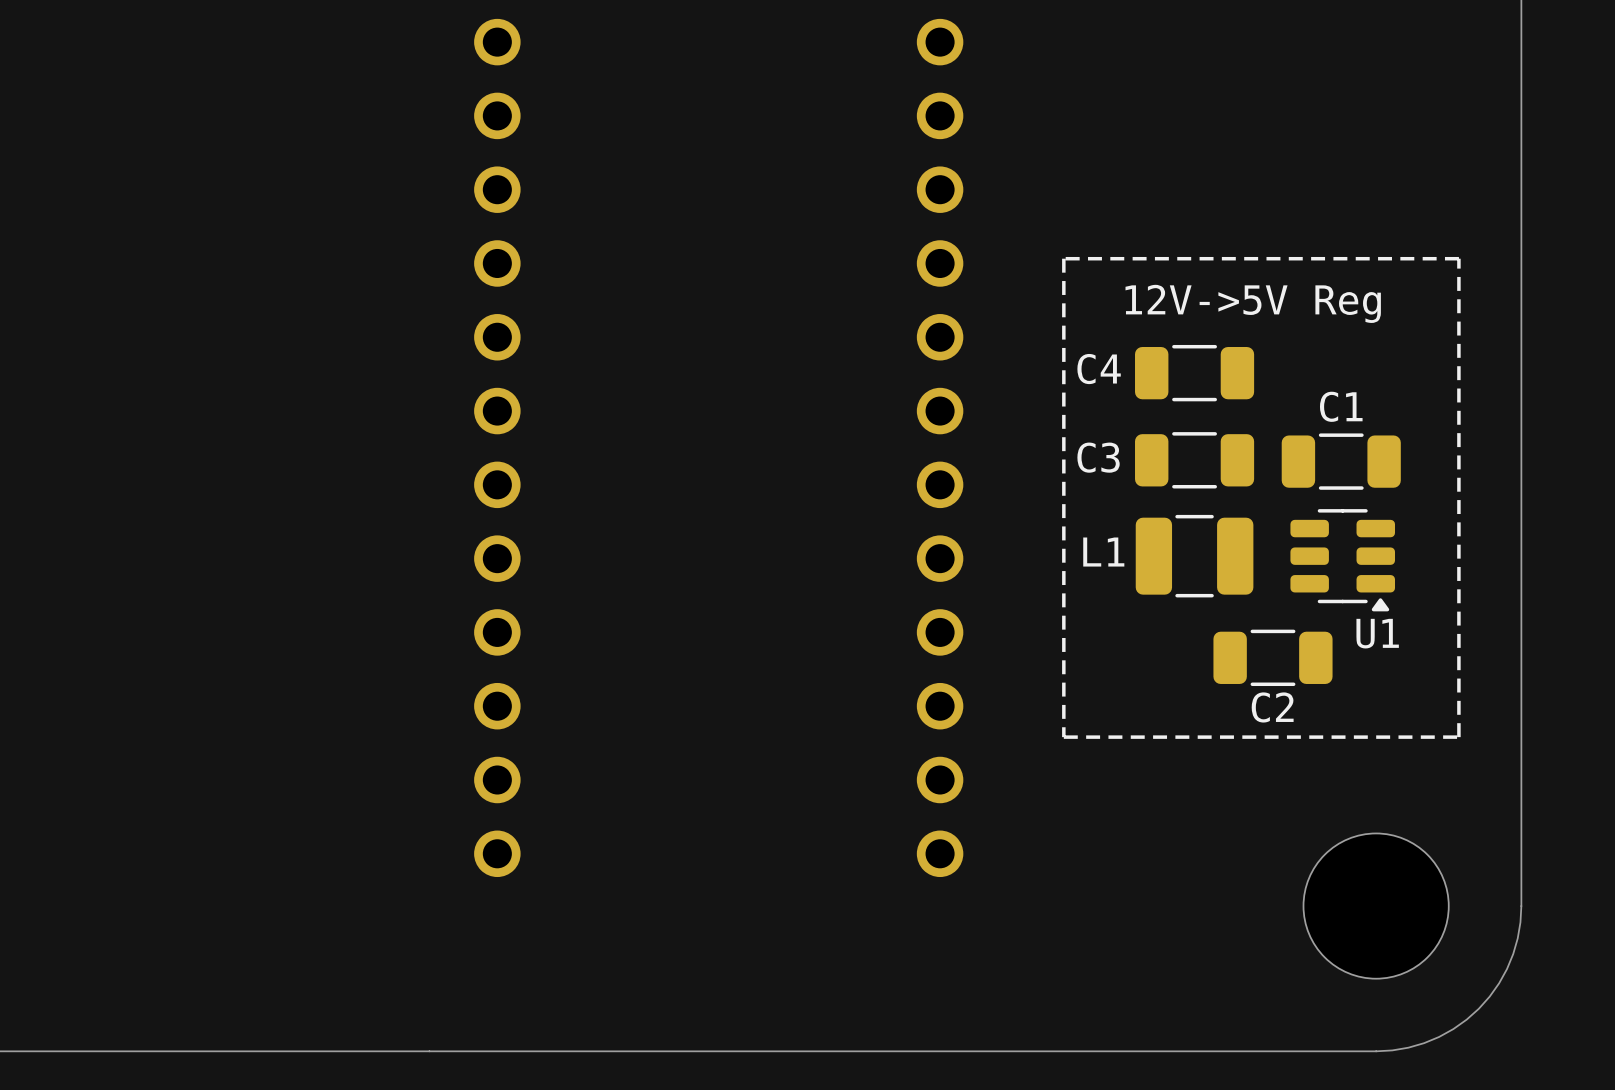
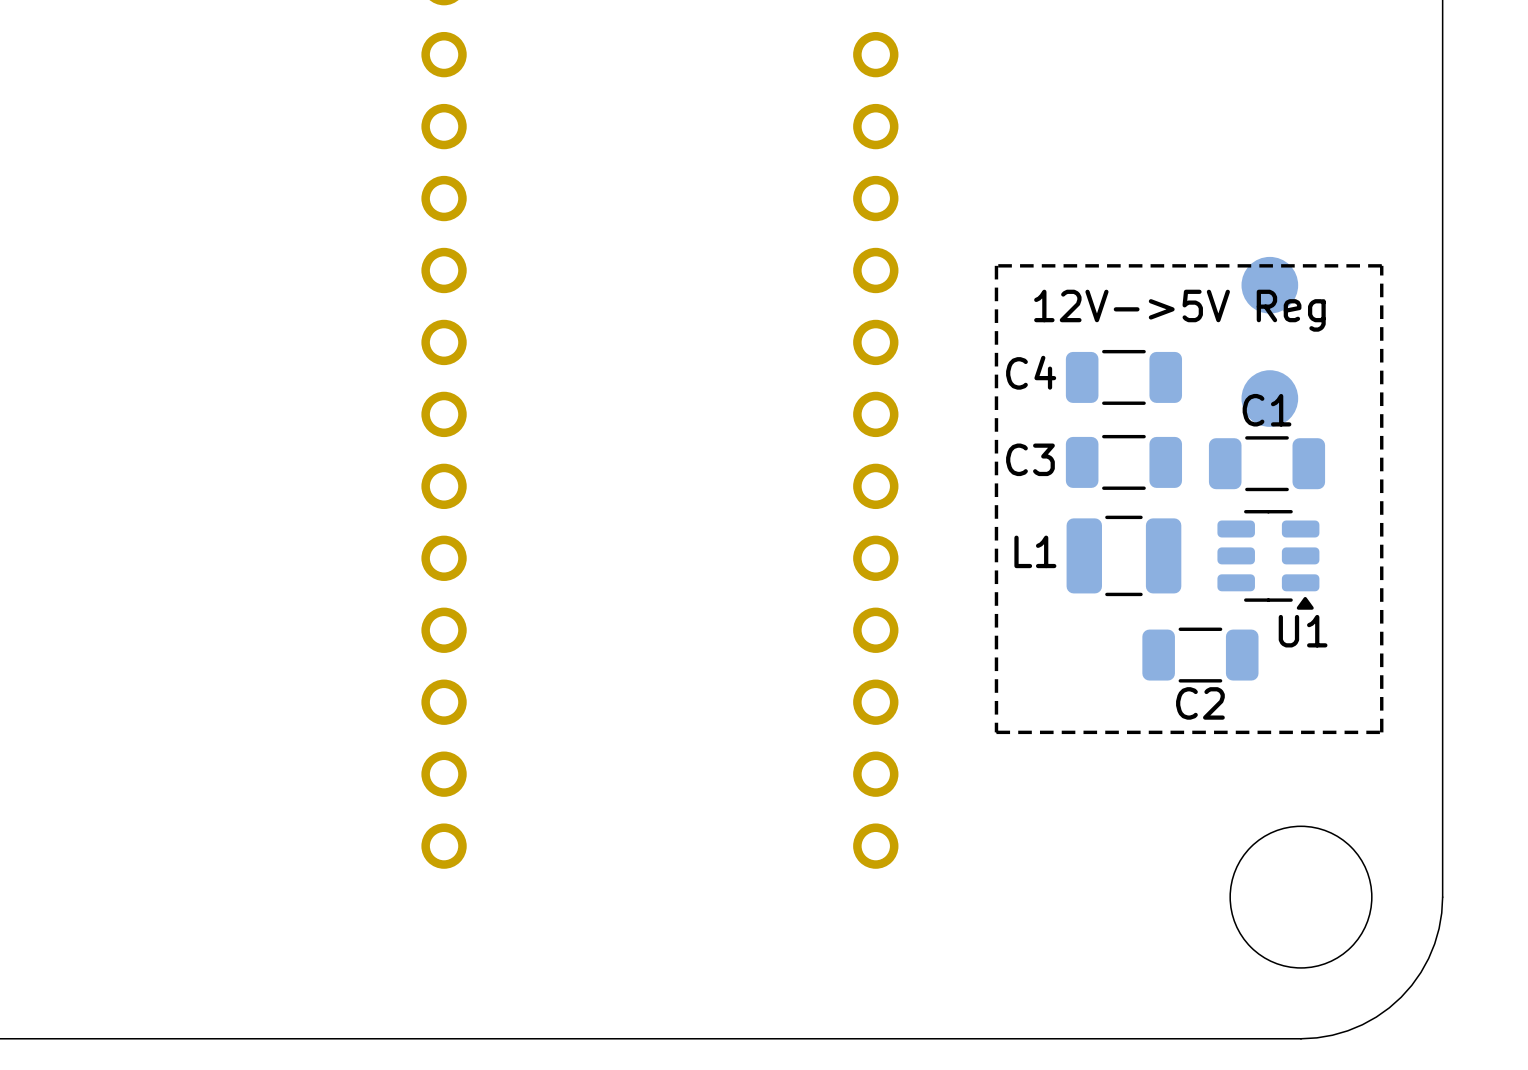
part: none -> (1269, 341)

